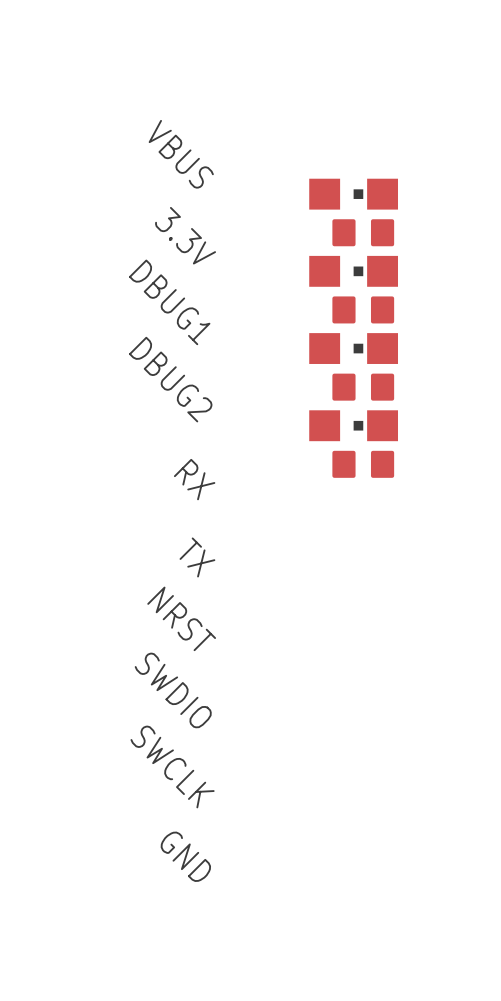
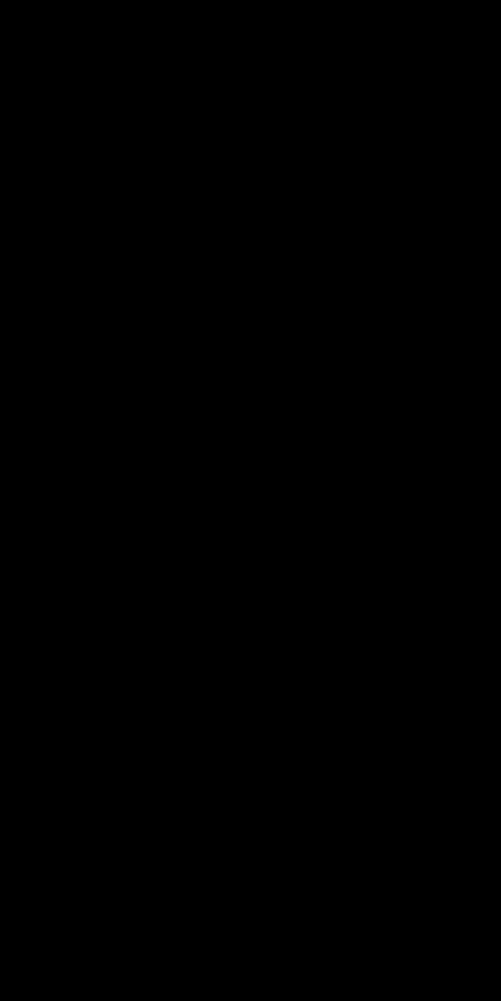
text: VBUS (181, 154) -> none
part: (353, 194) -> none
part: (363, 232) -> none
text: 3.3V (185, 235) -> none
part: (353, 271) -> none
text: DBUG1 (169, 302) -> none
part: (363, 309) -> none
part: (353, 348) -> none
text: DBUG2 (170, 379) -> none
part: (363, 387) -> none
part: (353, 425) -> none
part: (363, 464) -> none
text: RX (194, 479) -> none
text: TX (197, 557) -> none
text: NRST (181, 618) -> none
text: SWDIO (173, 690) -> none
text: SWCLK (172, 766) -> none
text: GND (185, 856) -> none

